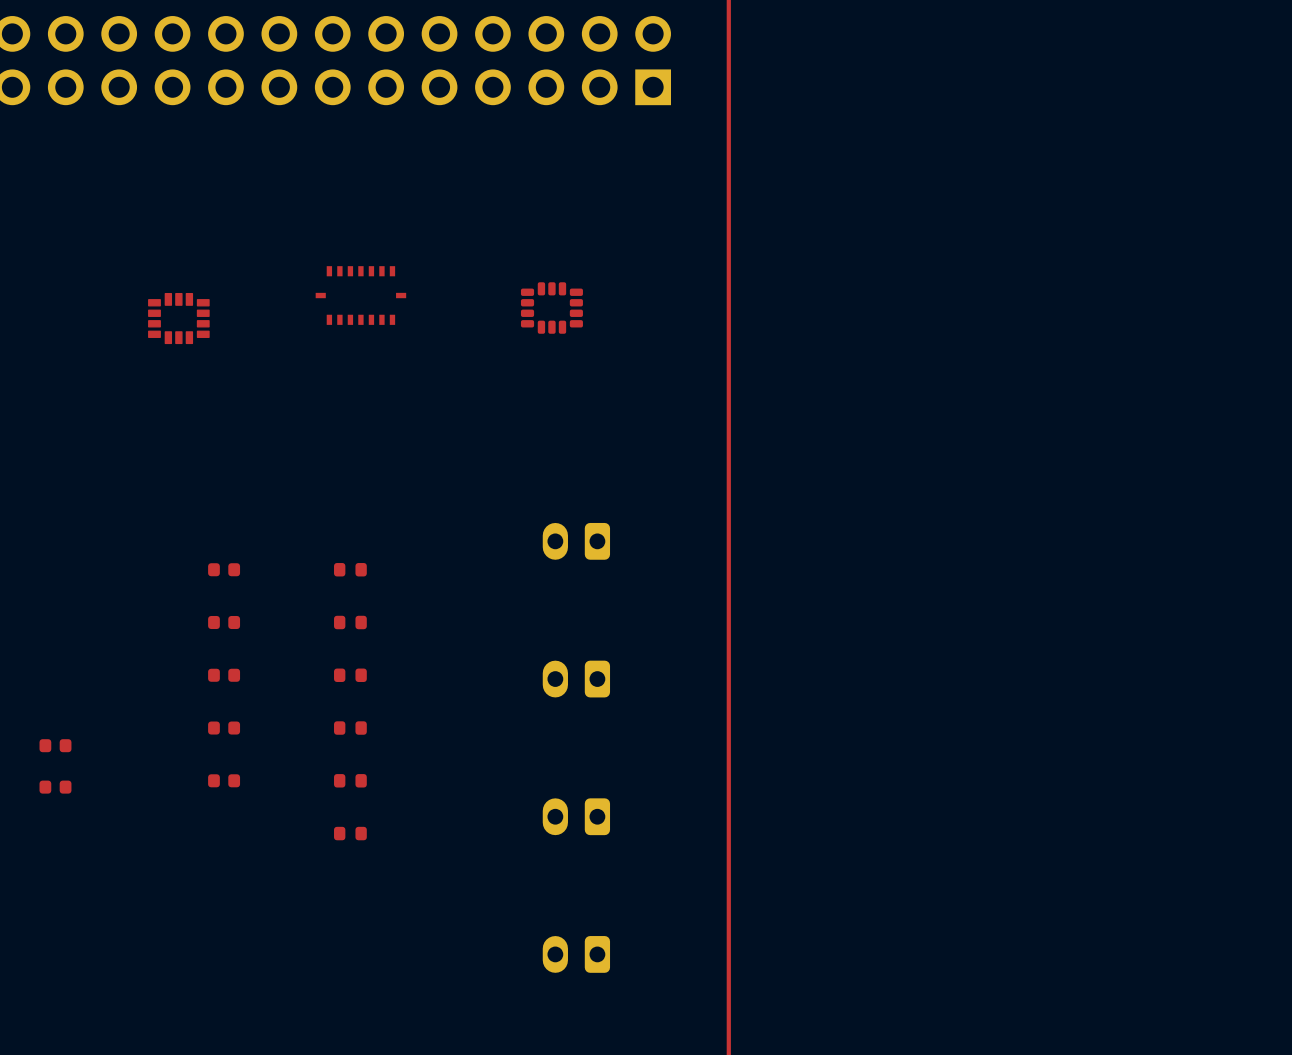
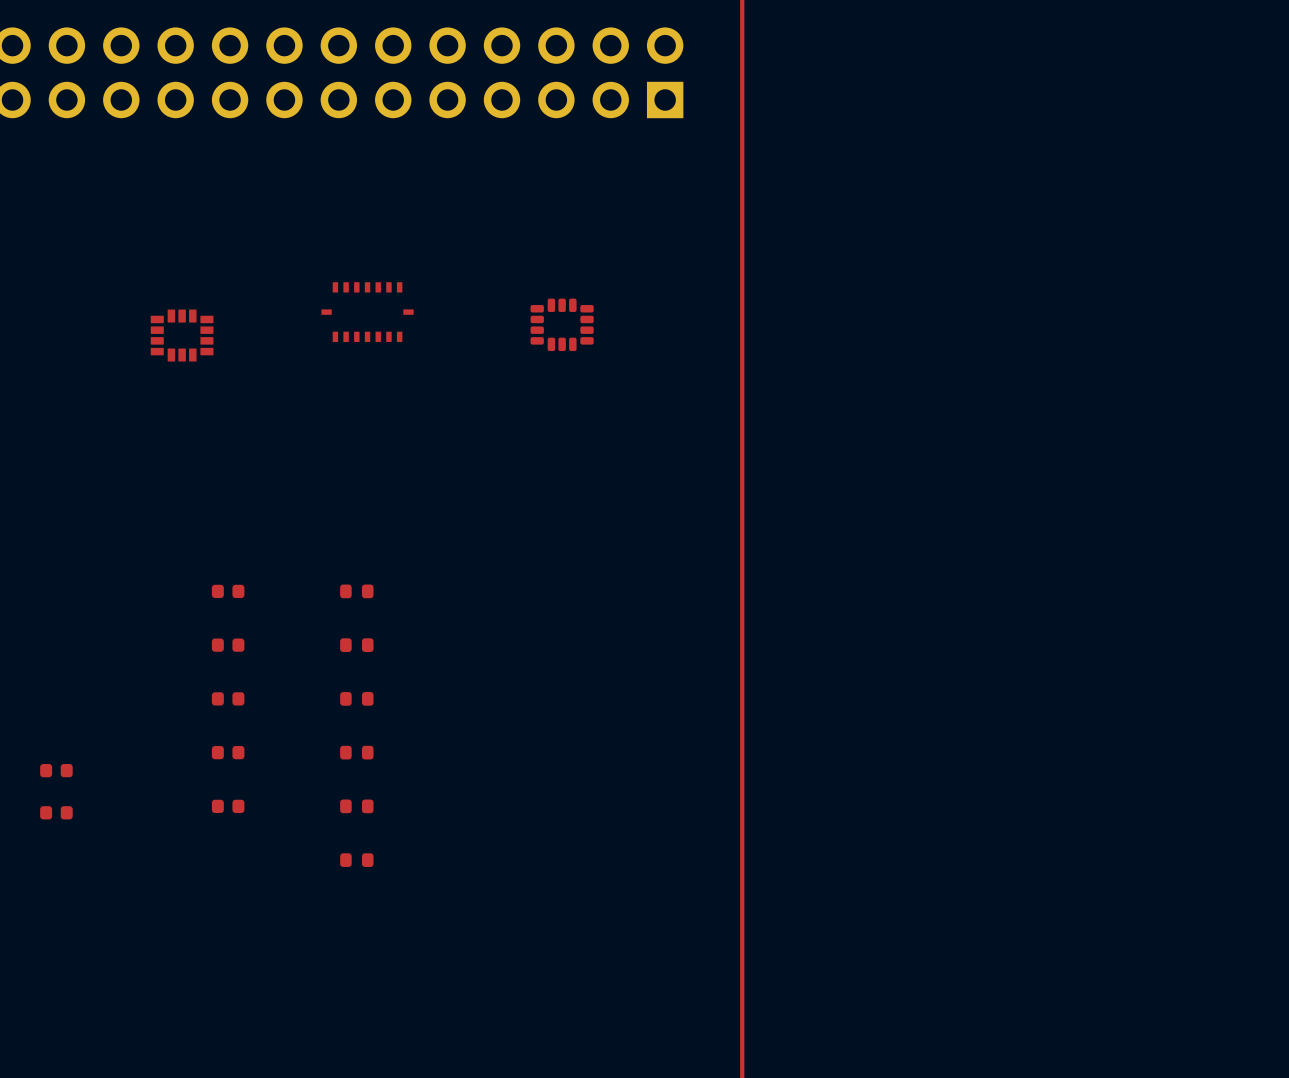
part: (576, 541) -> none
part: (576, 679) -> none
part: (576, 816) -> none
part: (576, 954) -> none

